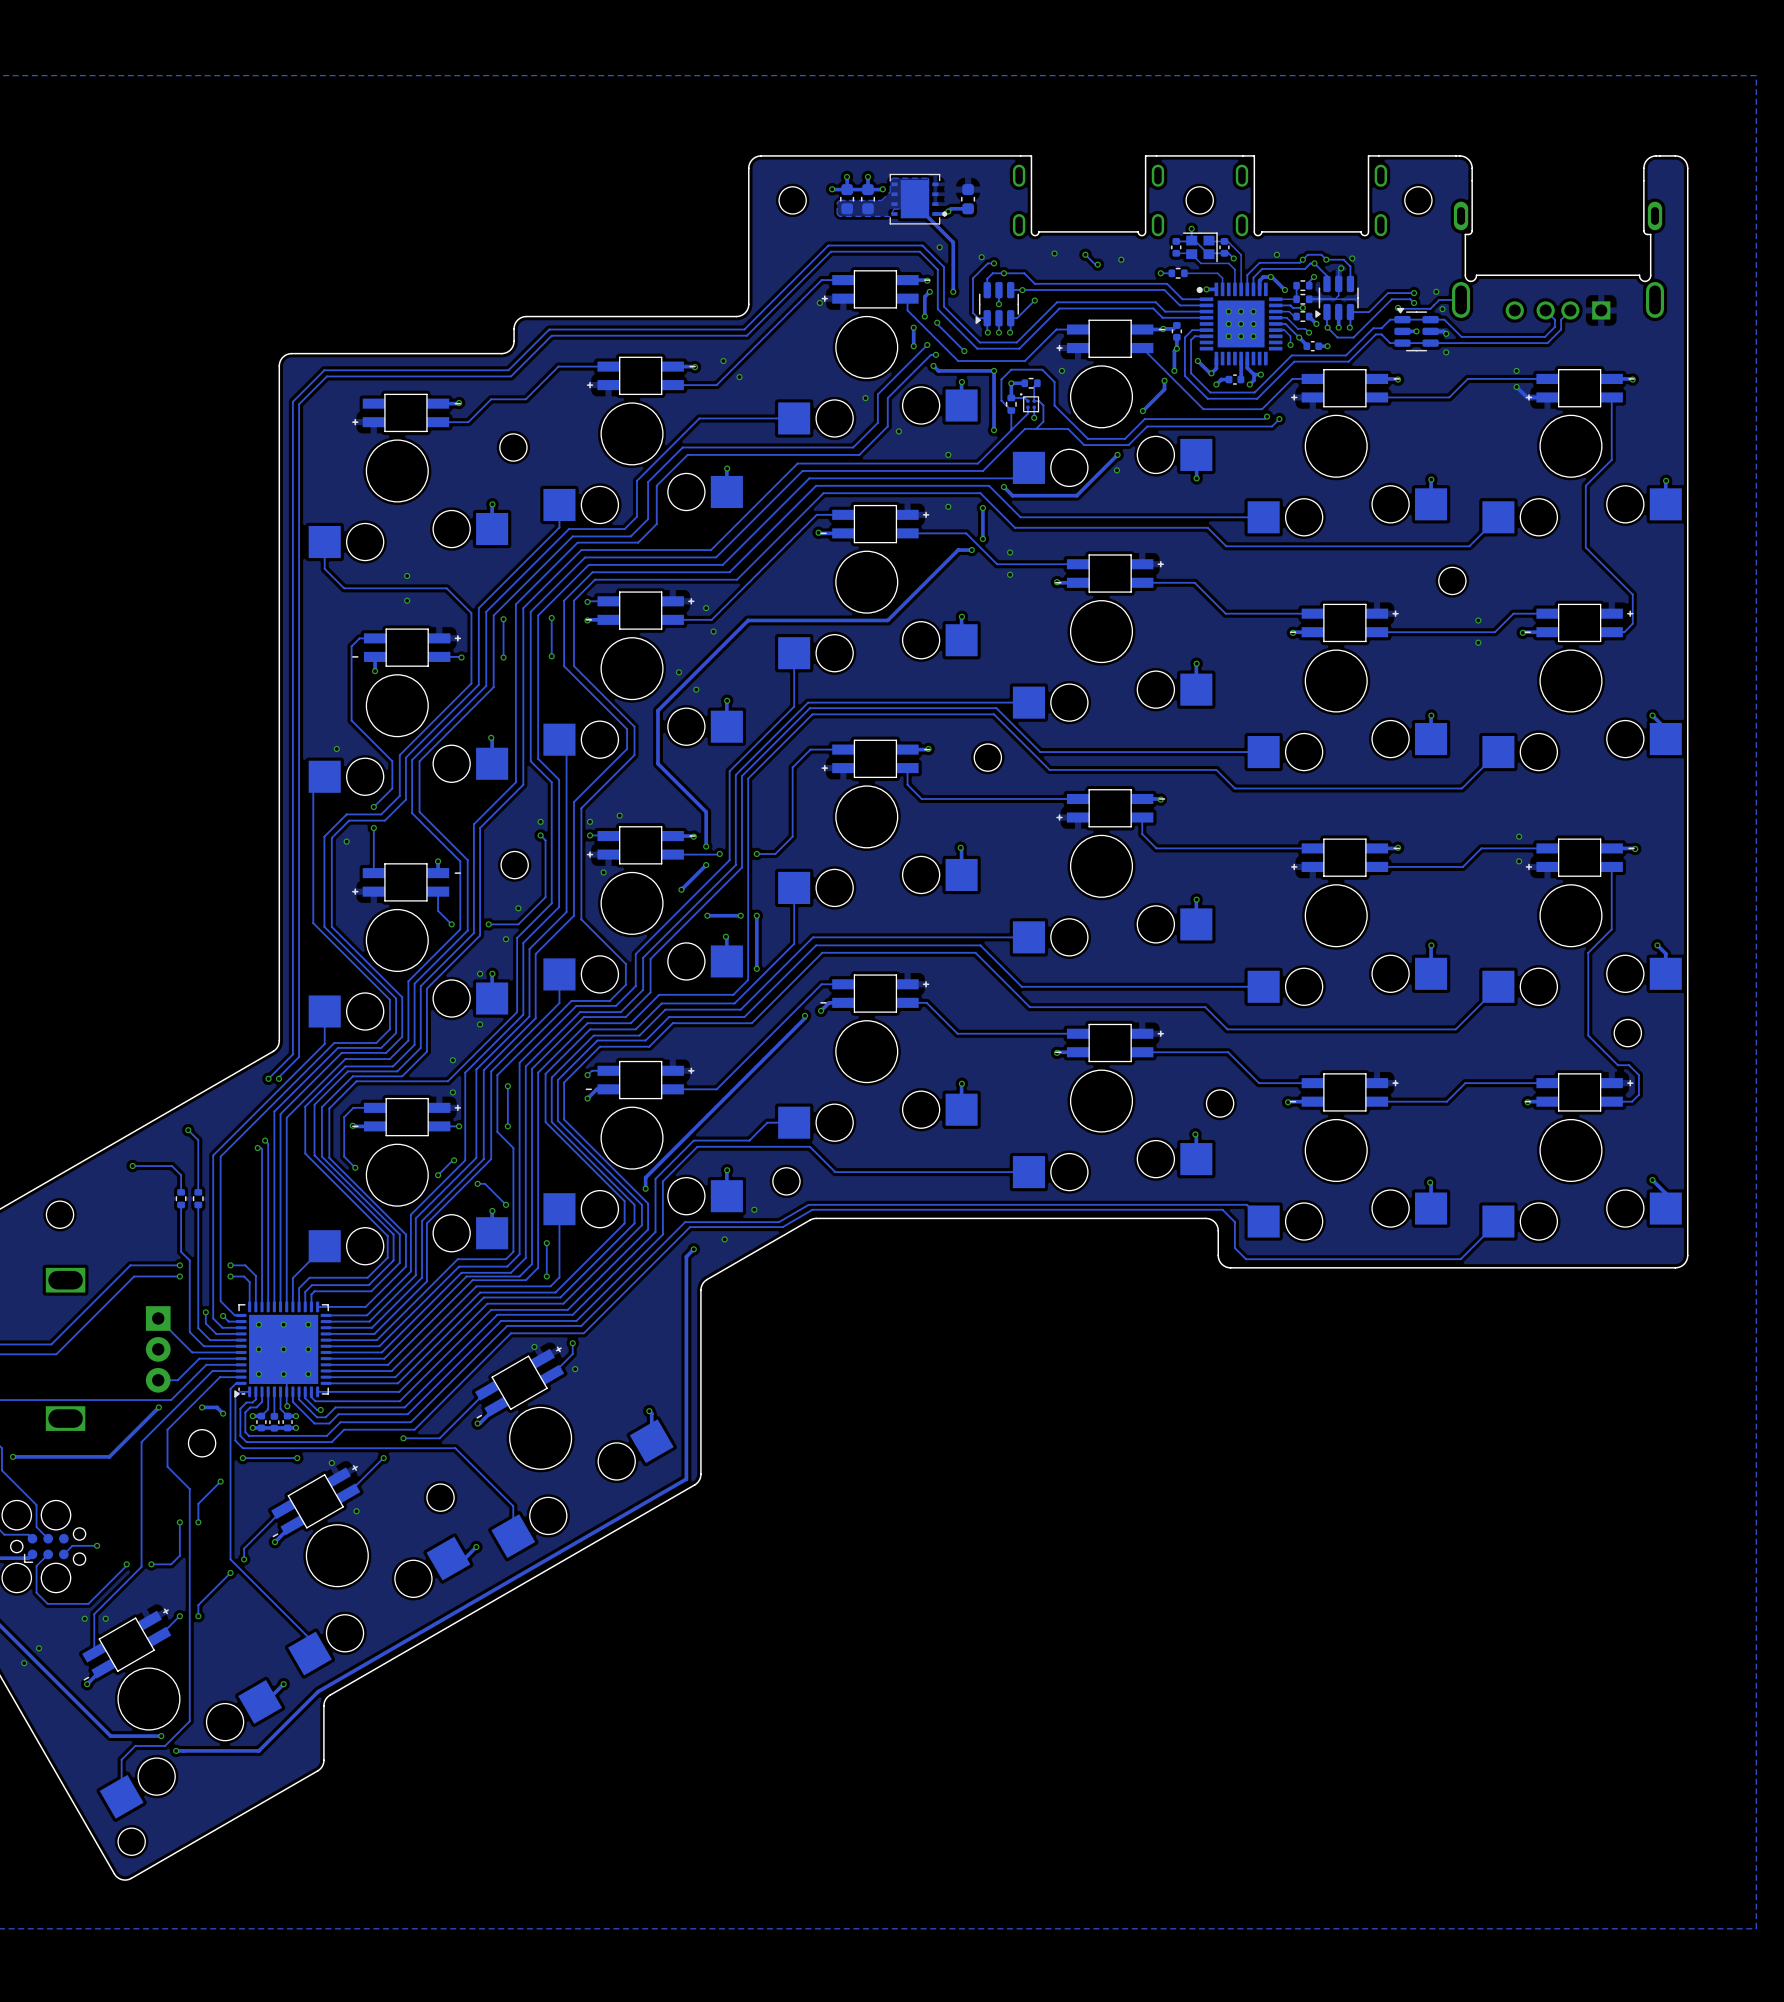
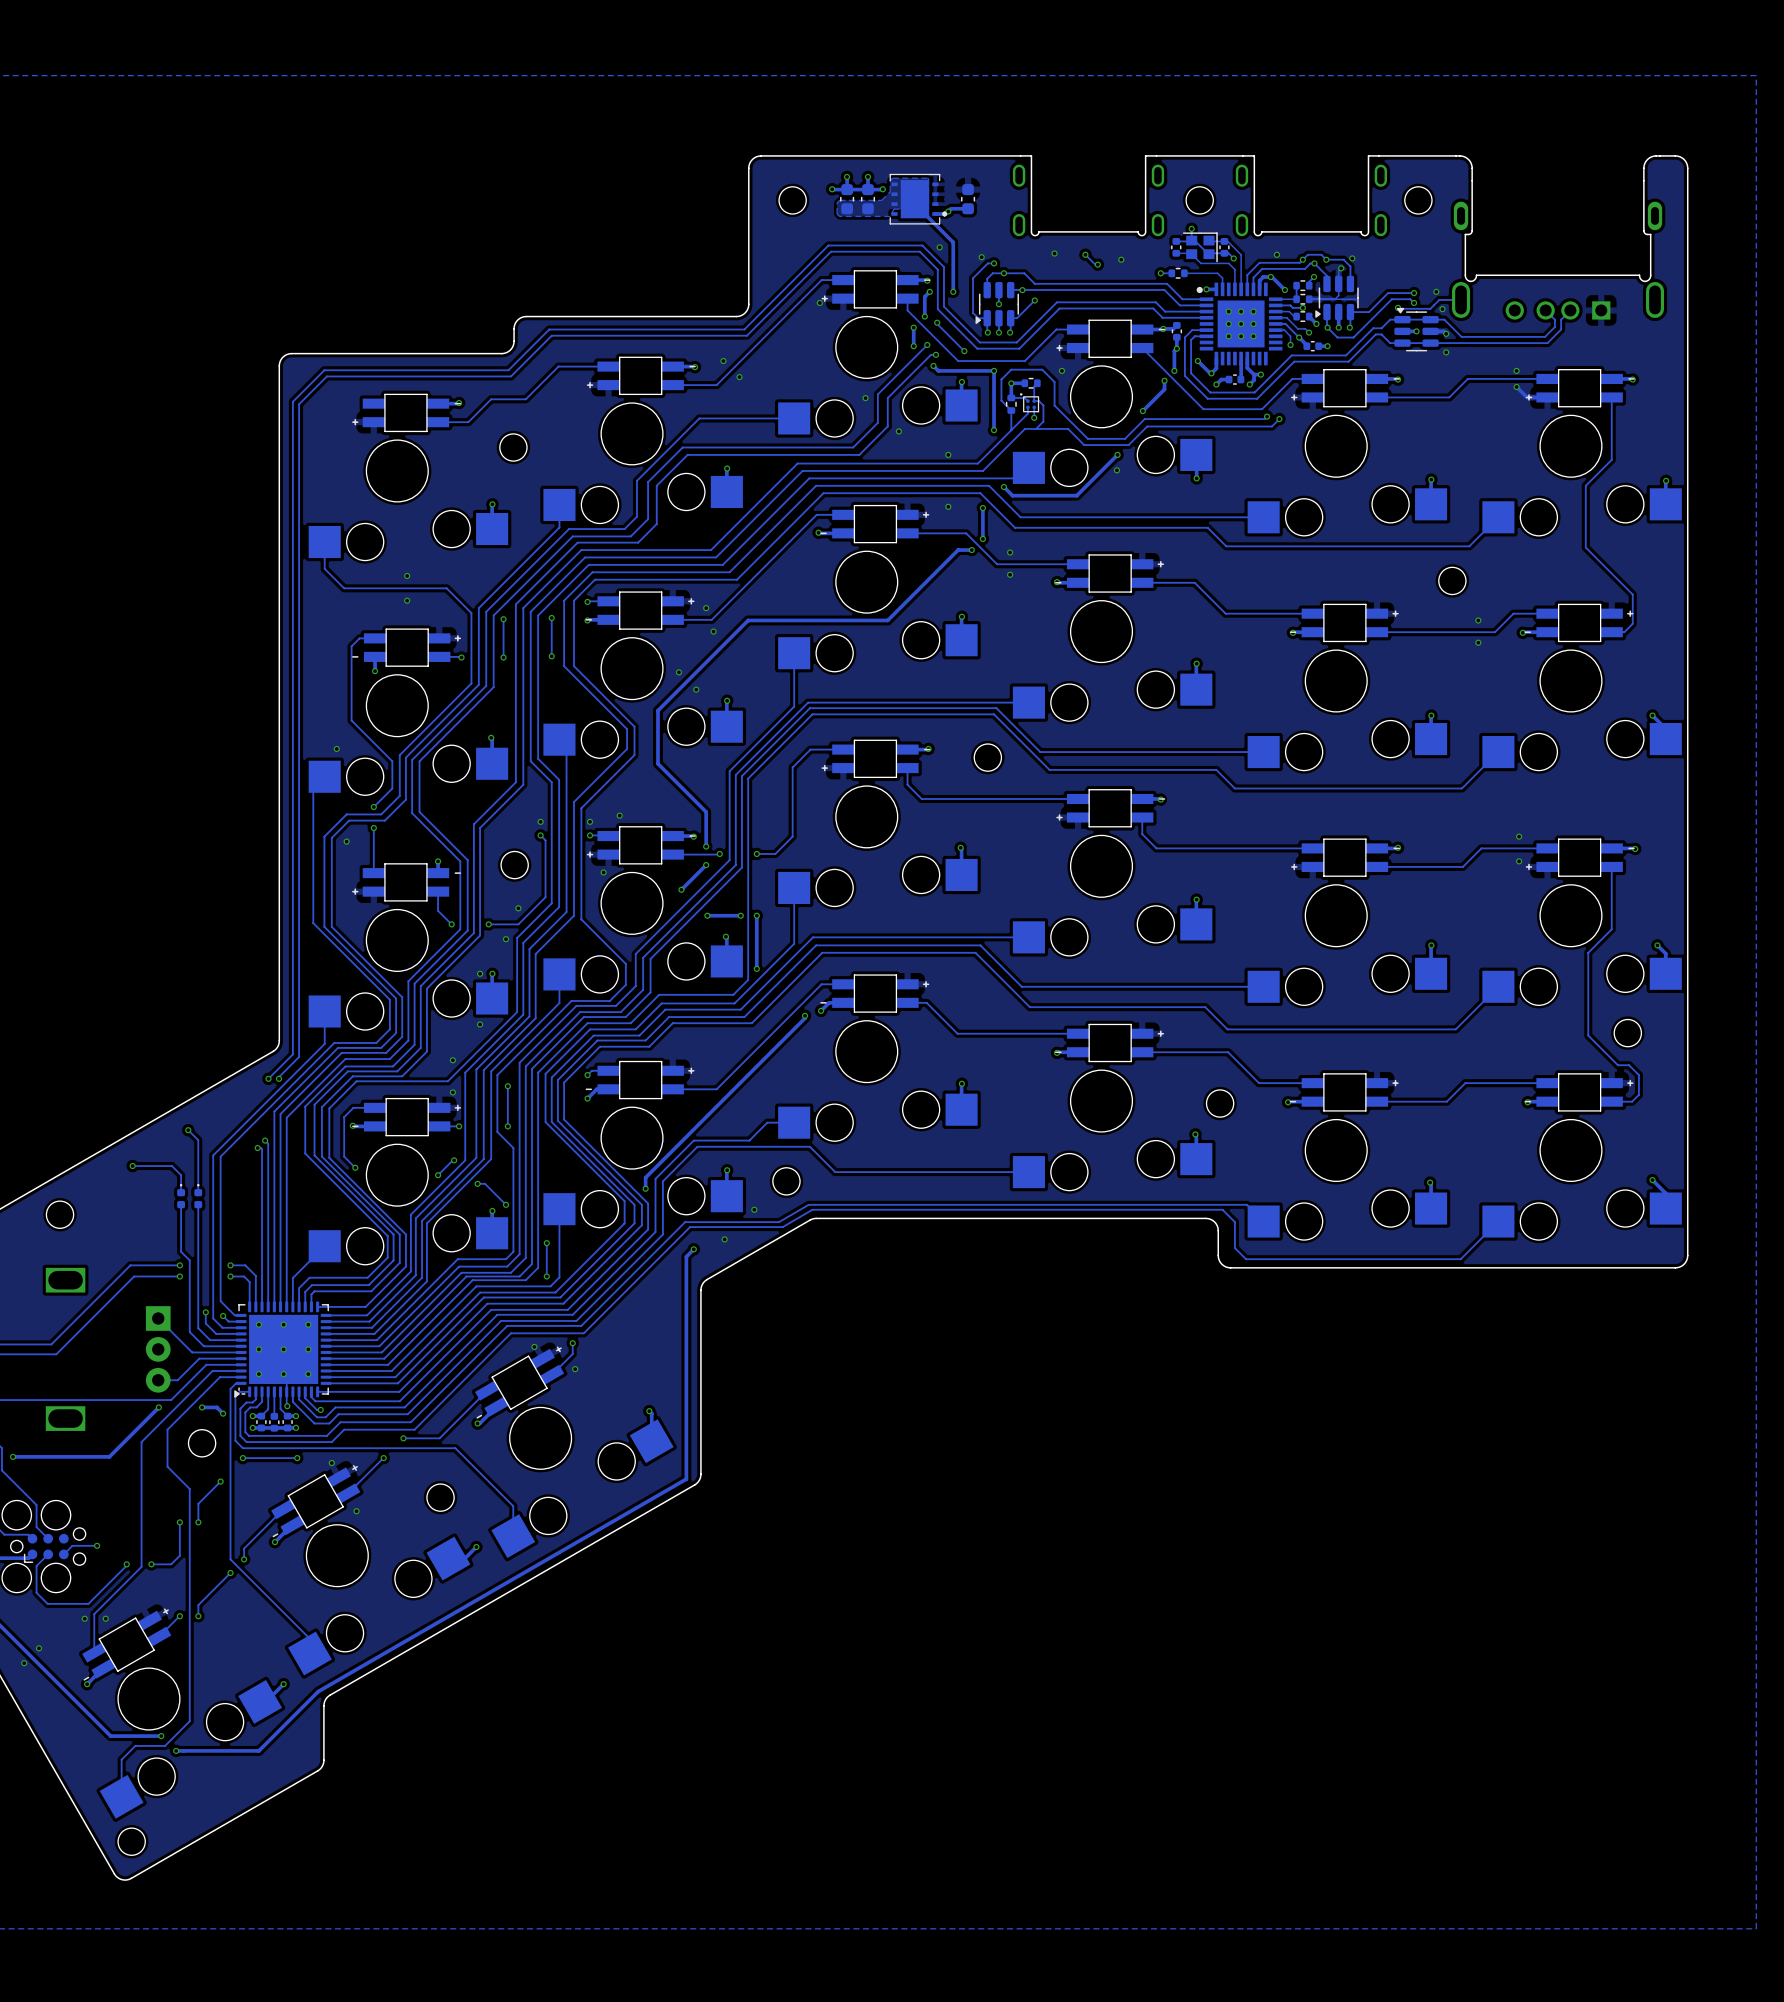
part footprint: [175, 1189, 187, 1209] -> [177, 1183, 186, 1209]
part footprint: [192, 1189, 204, 1209] -> [194, 1183, 203, 1209]

